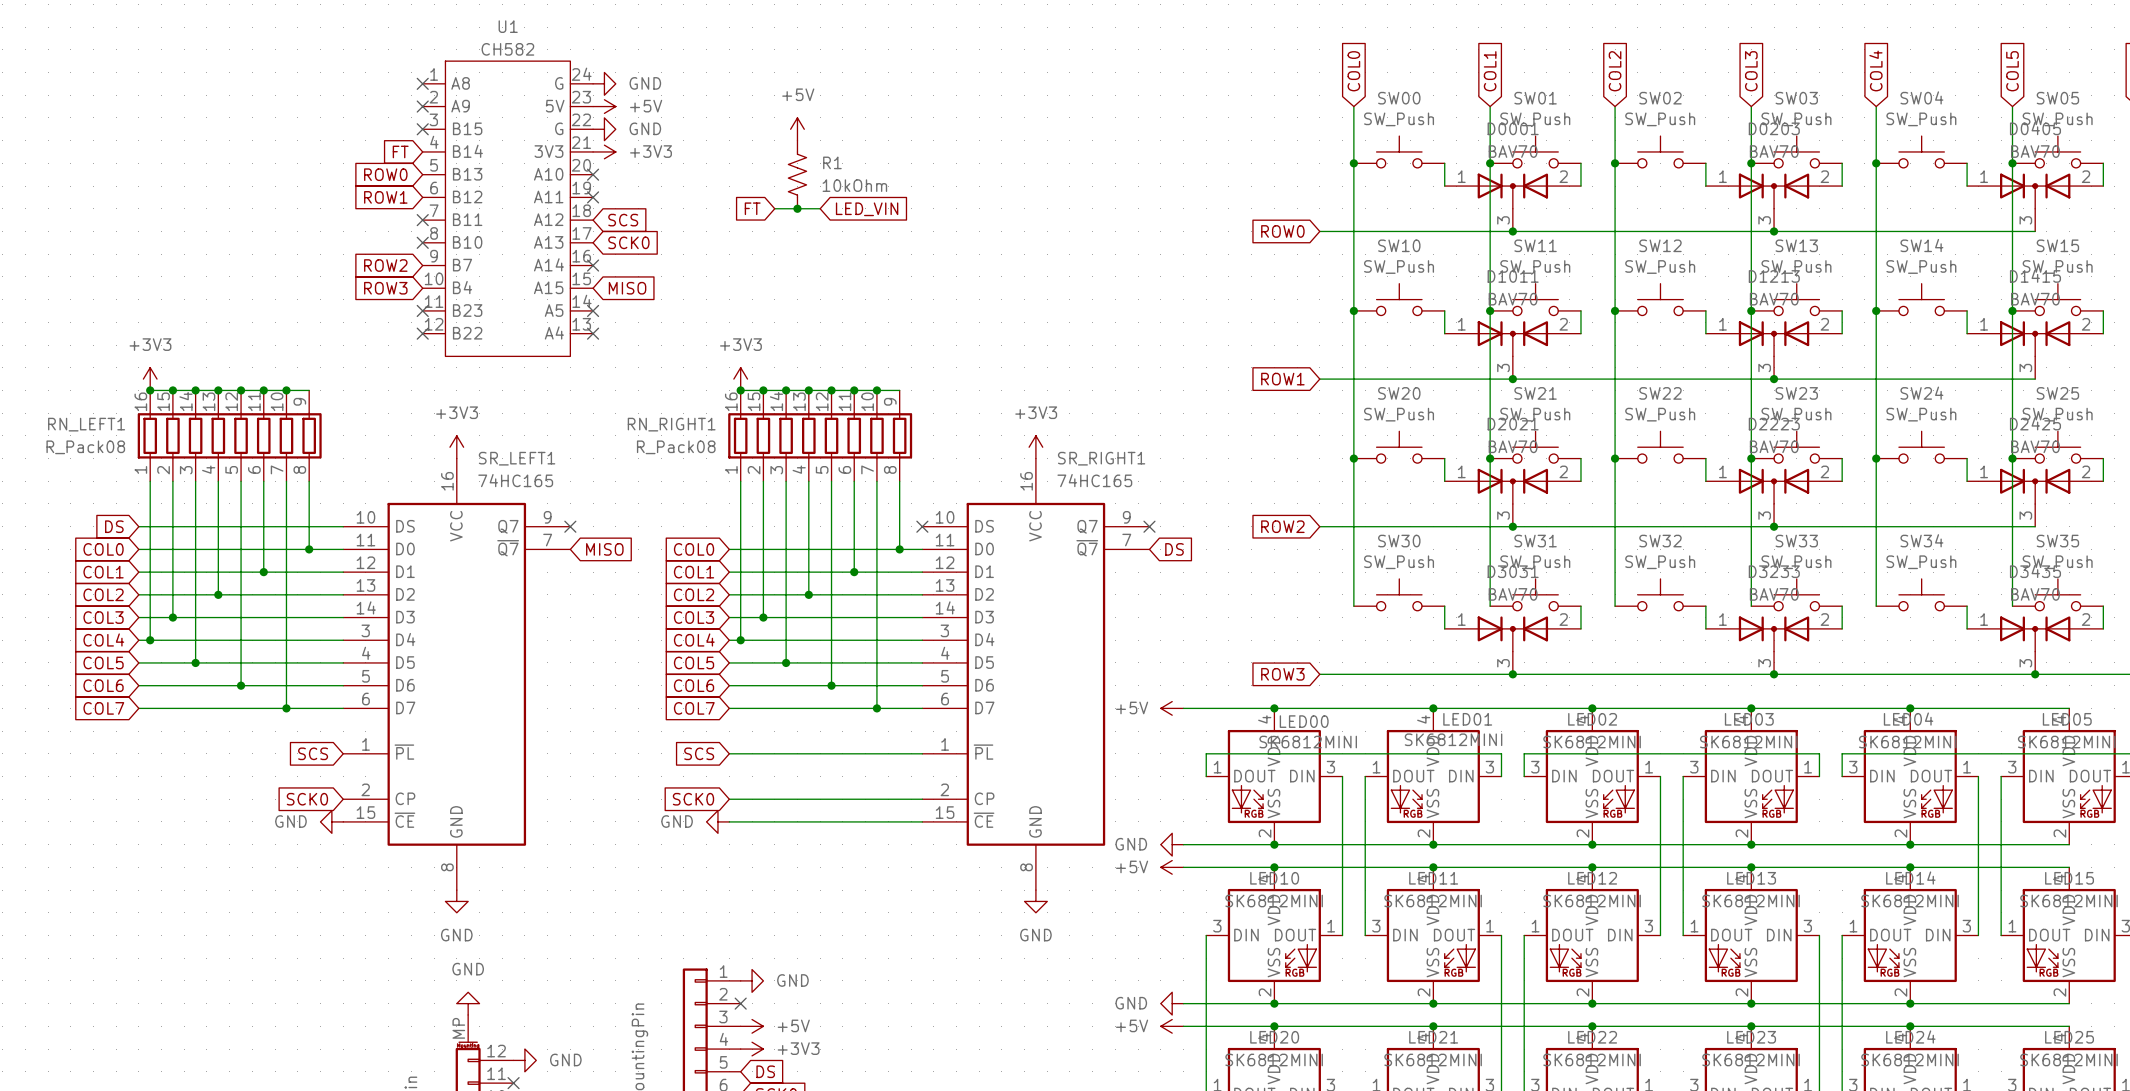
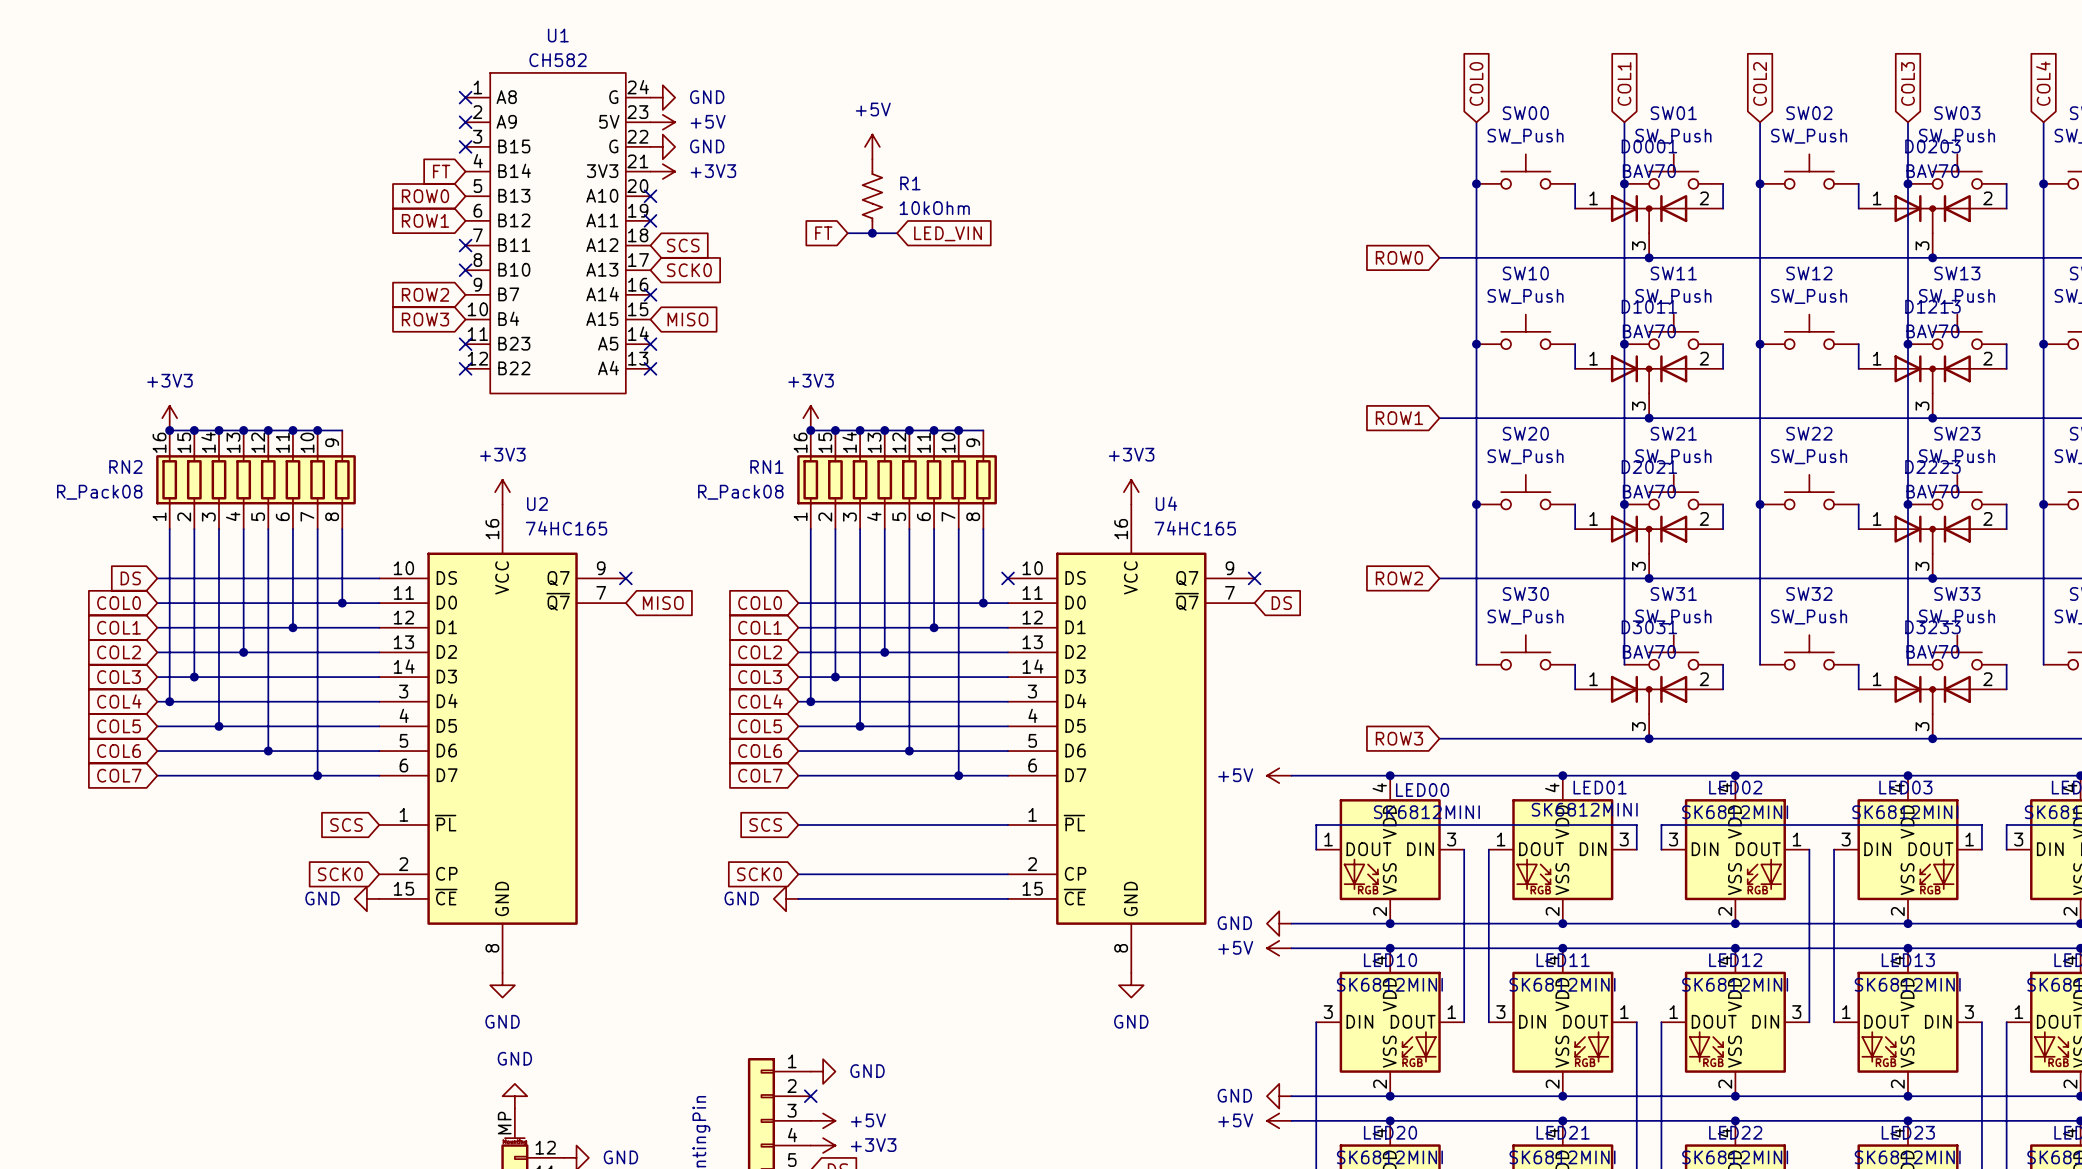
RN_LEFT1 name: RN_LEFT1 (86, 424) -> RN2 (125, 467)
RN_RIGHT1 name: RN_RIGHT1 (671, 424) -> RN1 (766, 467)
SR_LEFT1 name: SR_LEFT1 (517, 458) -> U2 (537, 503)
SR_RIGHT1 name: SR_RIGHT1 (1101, 458) -> U4 (1166, 503)

